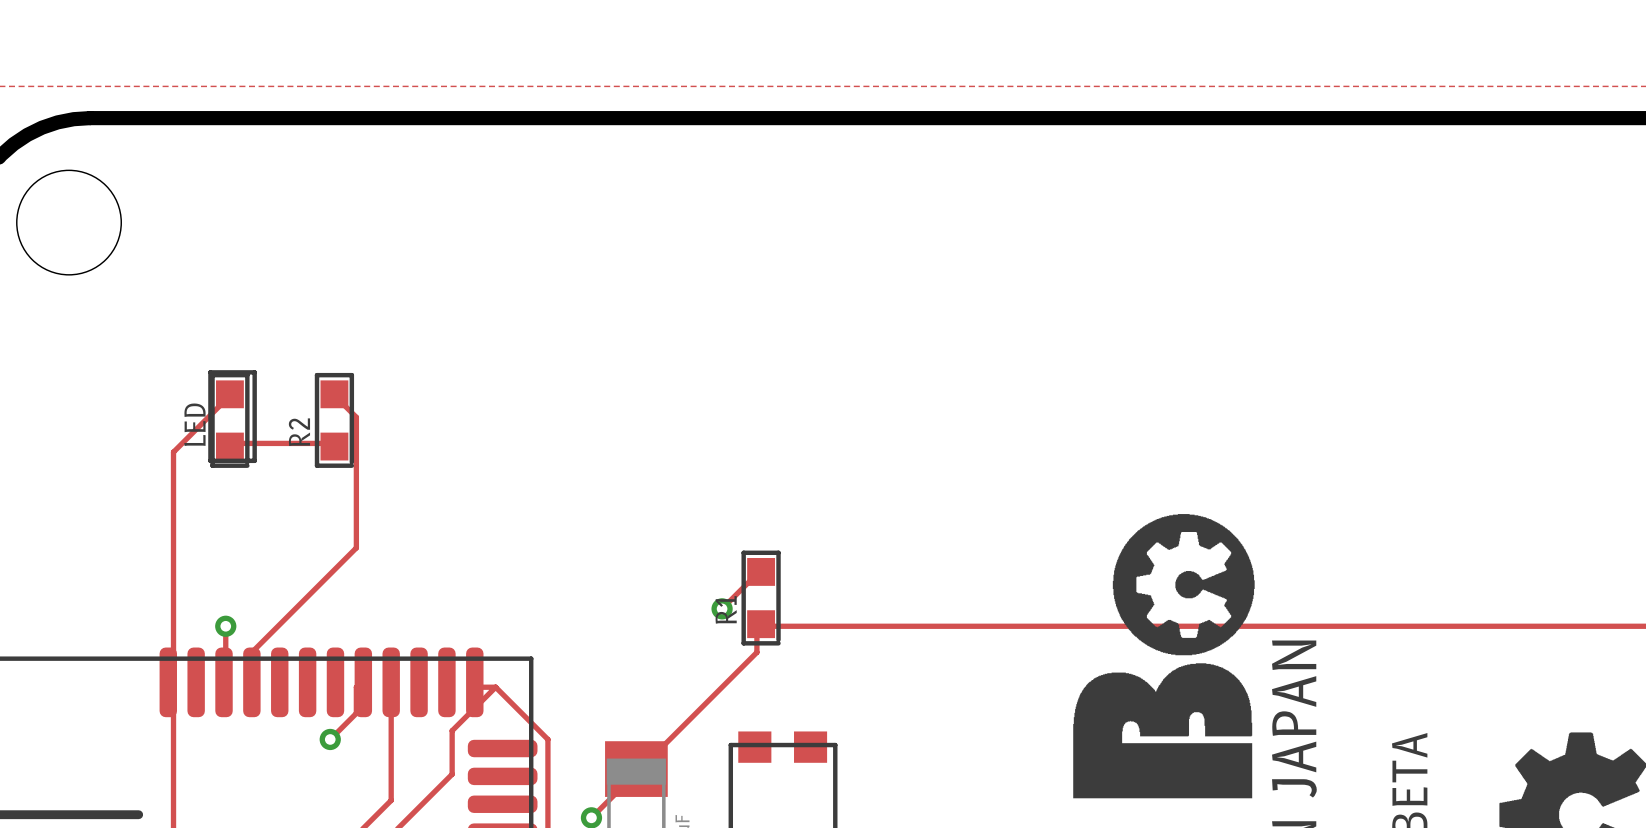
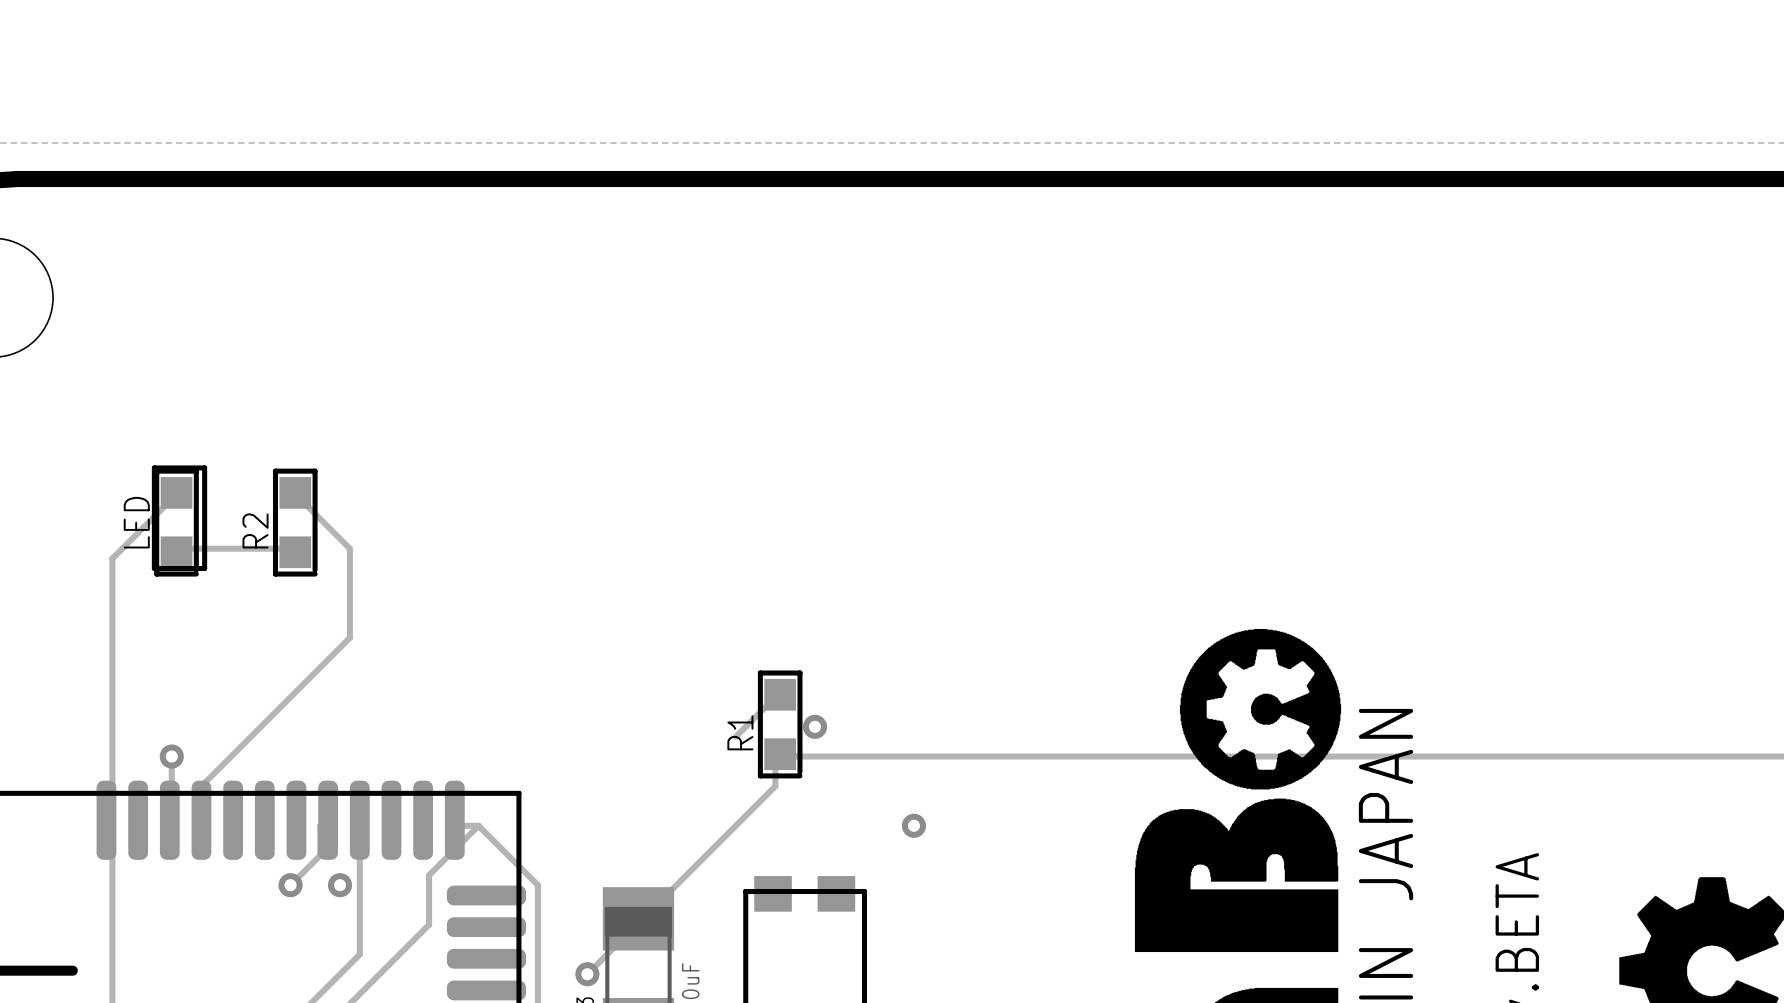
track: (356, 417) (356, 547) -> (320, 519) (349, 548) (349, 637) (320, 667)
via position: (722, 608) -> (815, 726)
via: none -> (913, 825)
via: none -> (340, 885)

